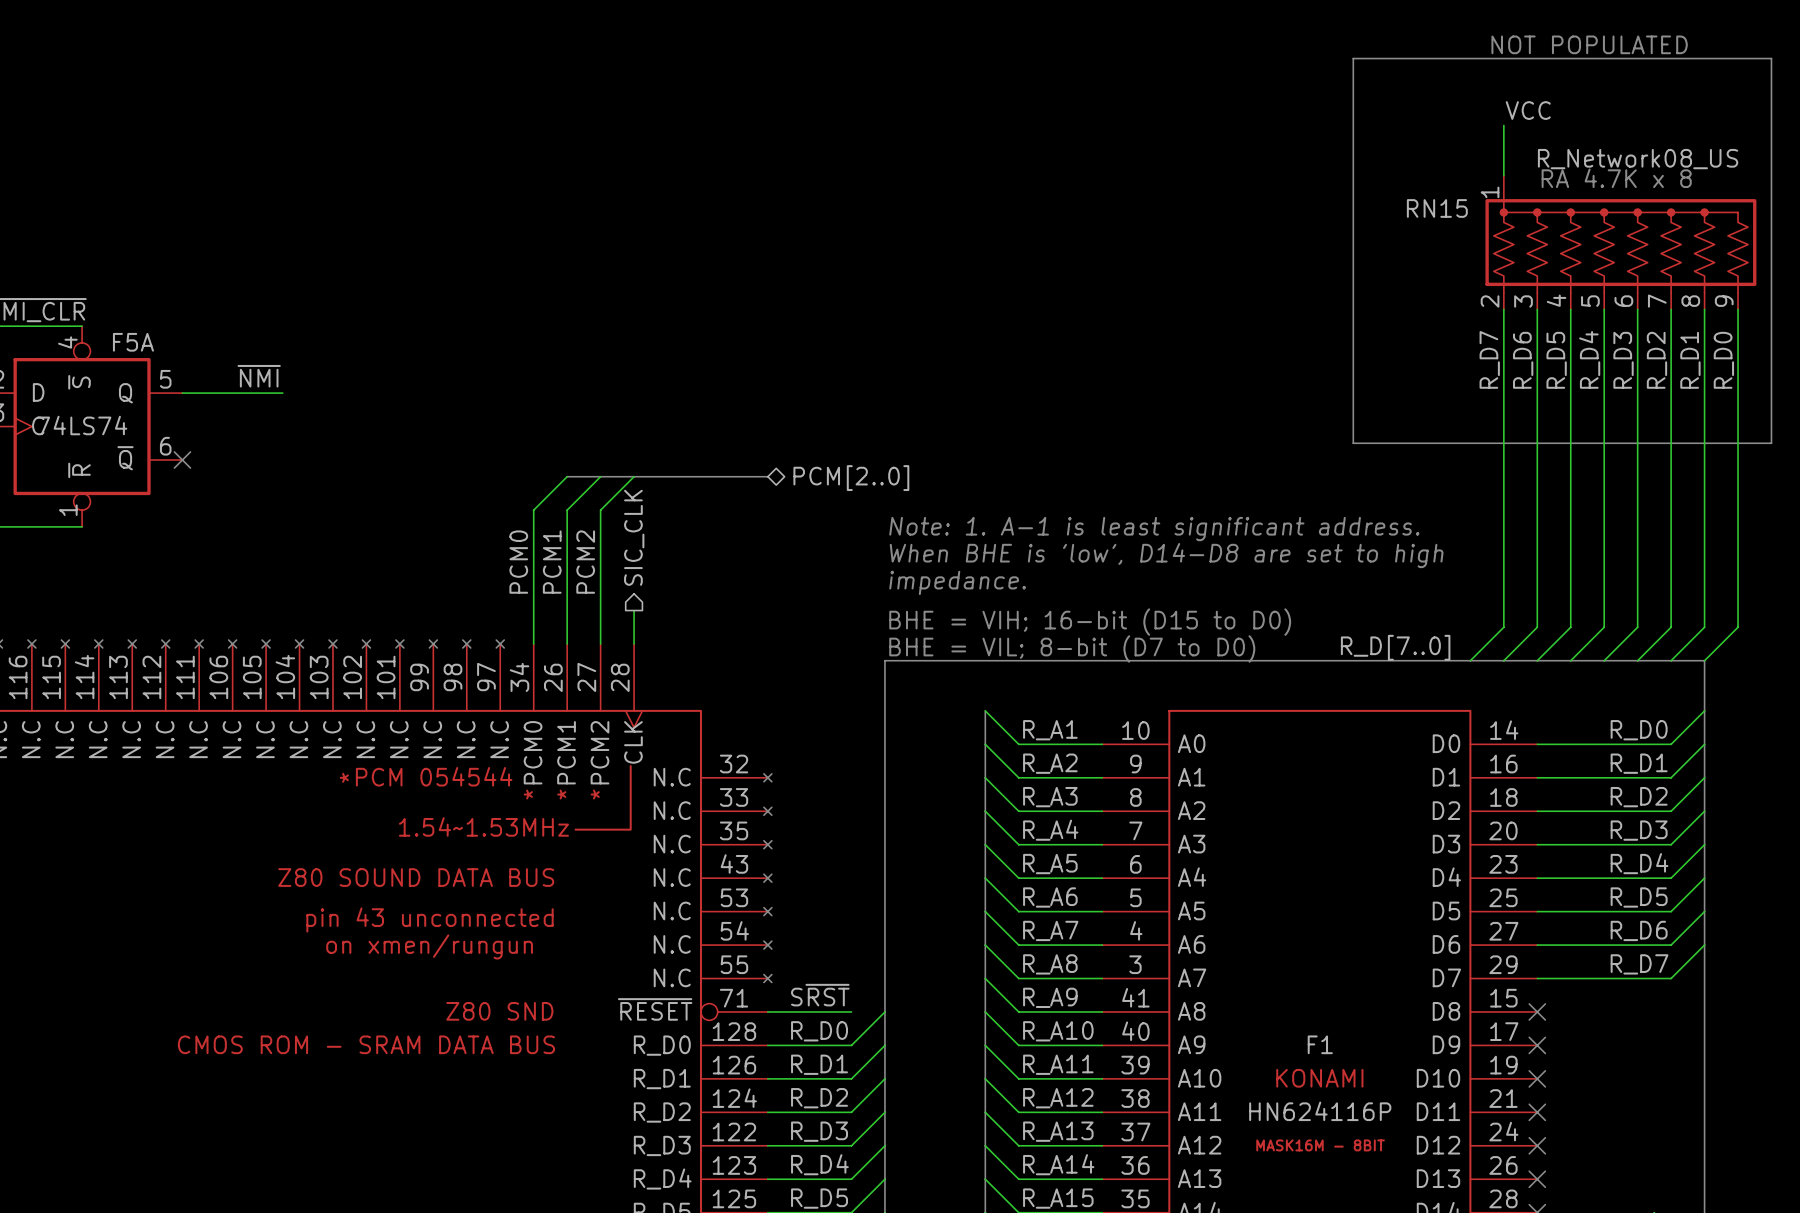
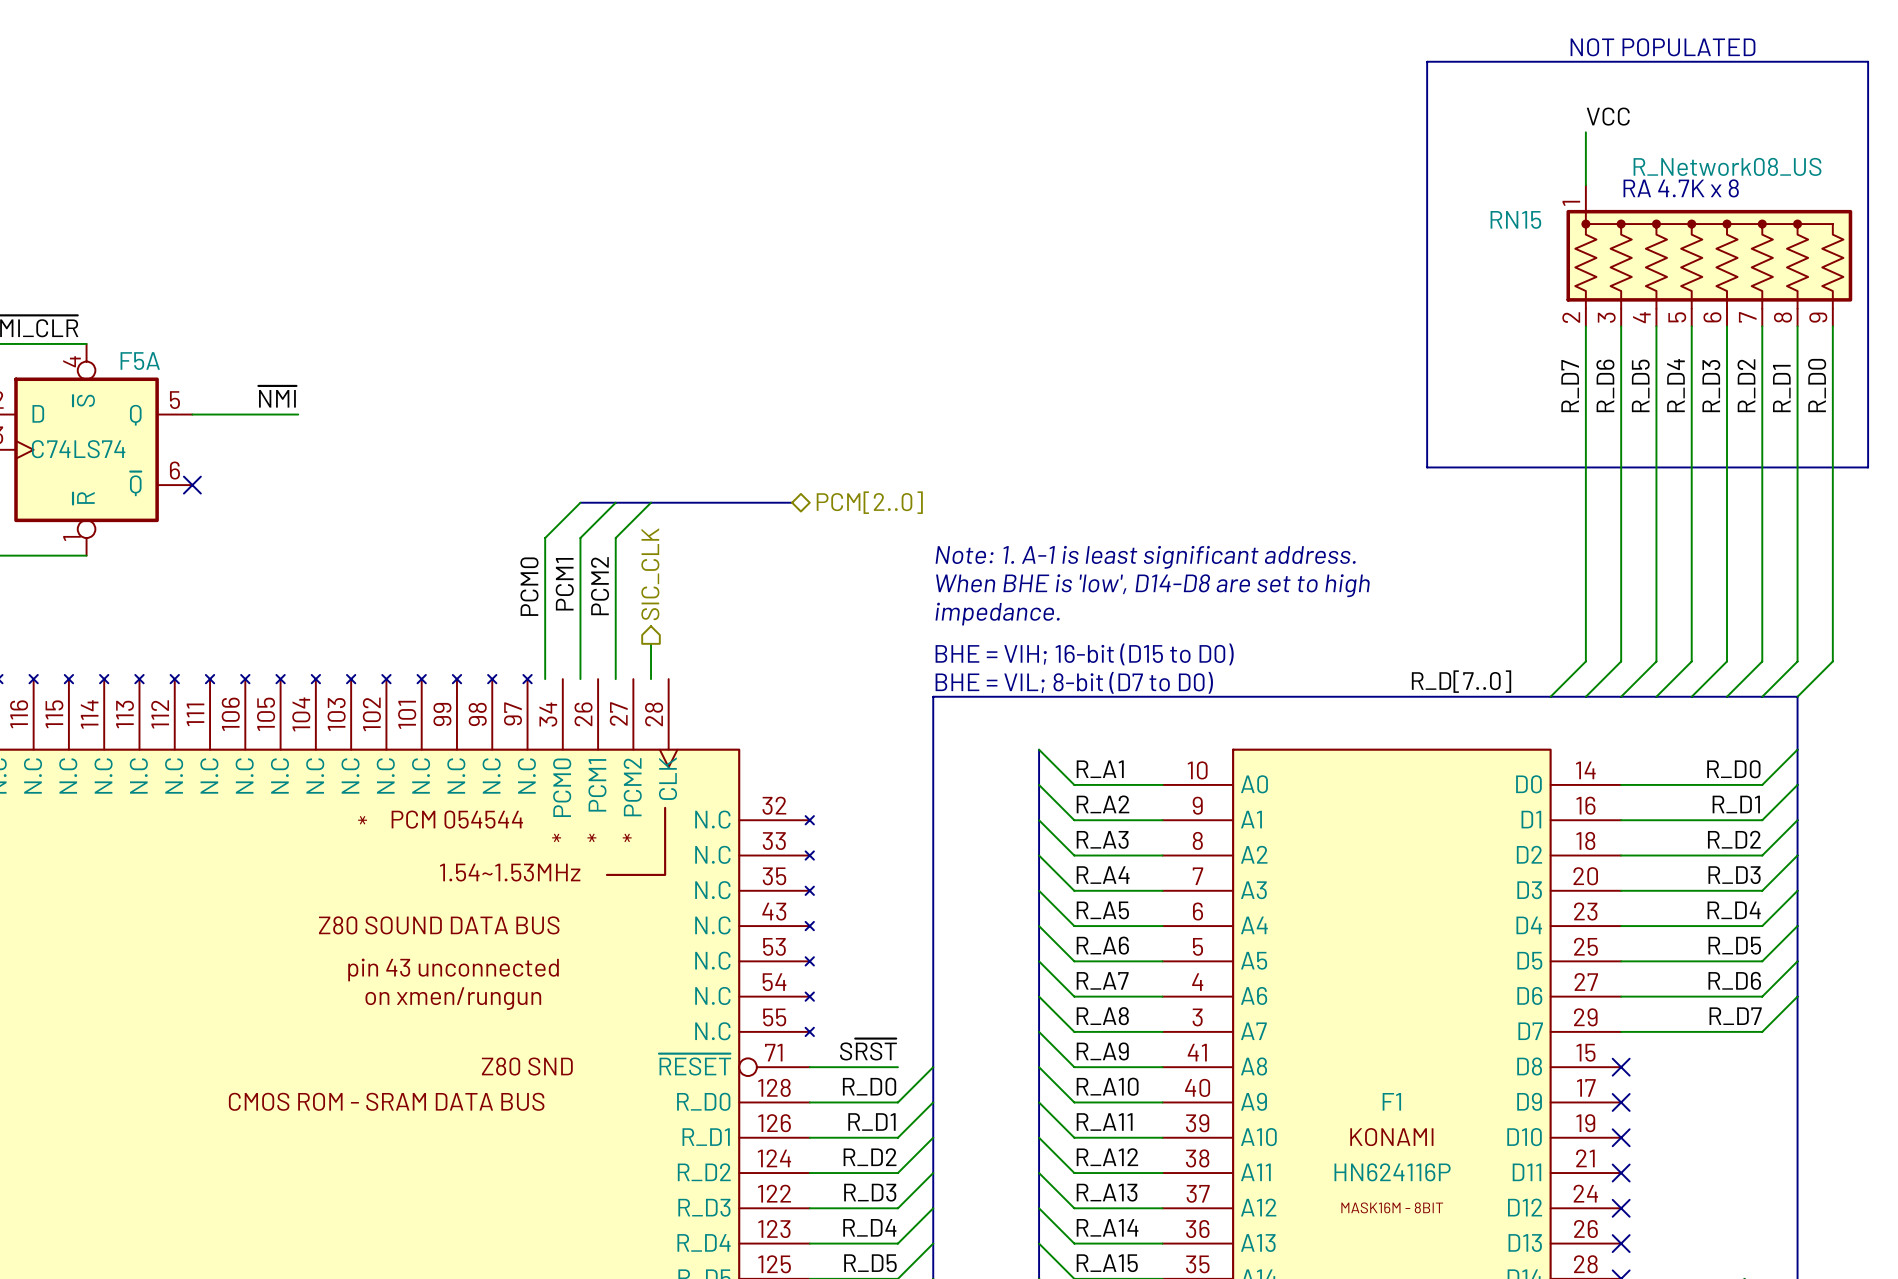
wire: (567, 476) (533, 510) (533, 643) -> (580, 502) (545, 538) (545, 679)
wire: (600, 476) (567, 510) (567, 643) -> (615, 502) (580, 538) (580, 679)
wire: (634, 476) (600, 510) (600, 643) -> (651, 502) (615, 538) (615, 679)
bus: (751, 476) (767, 476) -> (580, 502) (598, 502)
hierarchical label position: PCM[2..0] (851, 478) -> PCM[2..0] (869, 502)
hierarchical label position: SIC_CLK (634, 537) -> SIC_CLK (650, 574)
label position: PCM0 (518, 562) -> PCM0 (529, 586)
label position: PCM1 (552, 562) -> PCM1 (564, 584)
label position: PCM2 (585, 562) -> PCM2 (600, 586)
wire: (634, 610) (634, 643) -> (651, 643) (651, 679)

